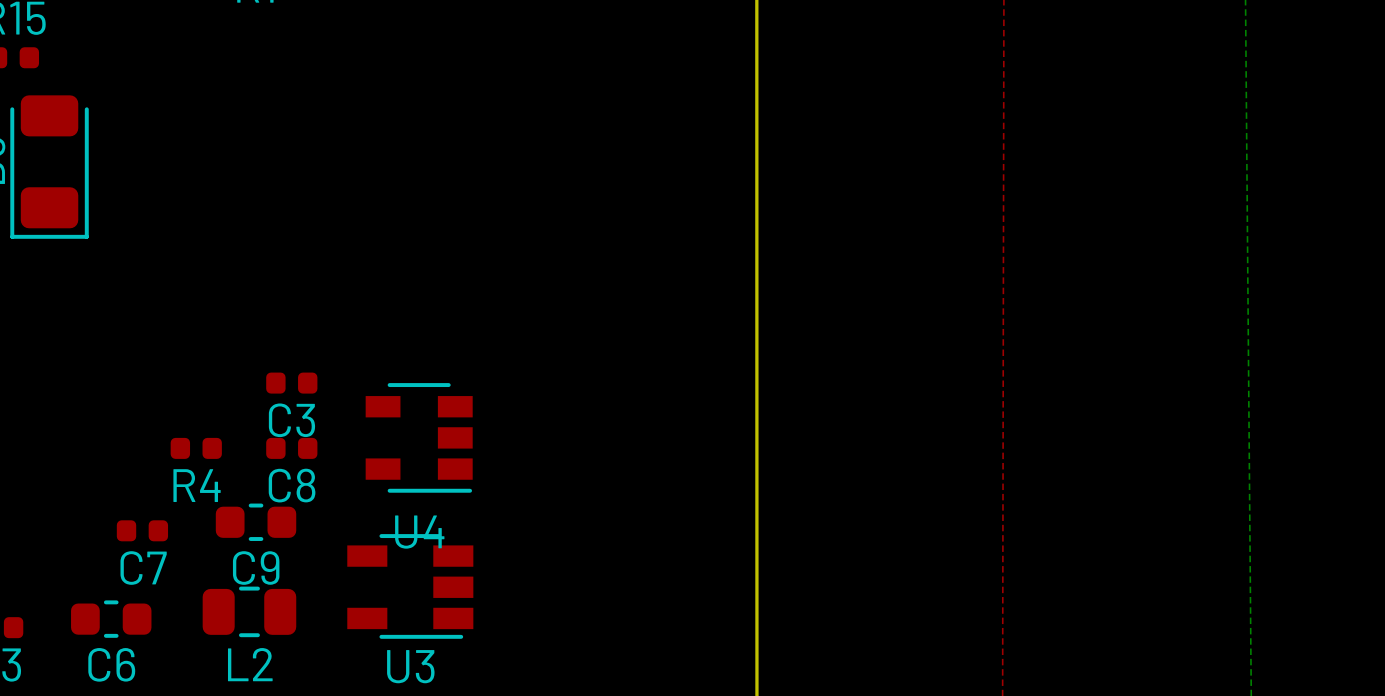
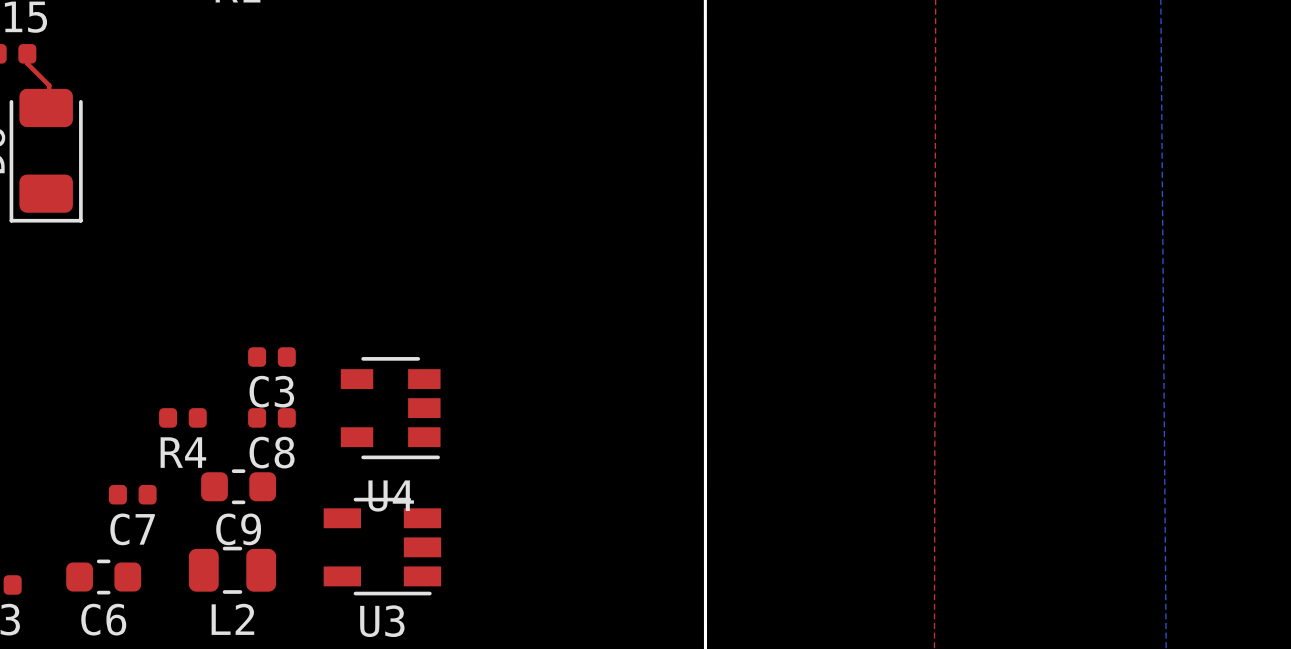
top track: none -> (27, 53) (27, 63) (49, 85) (49, 107)

